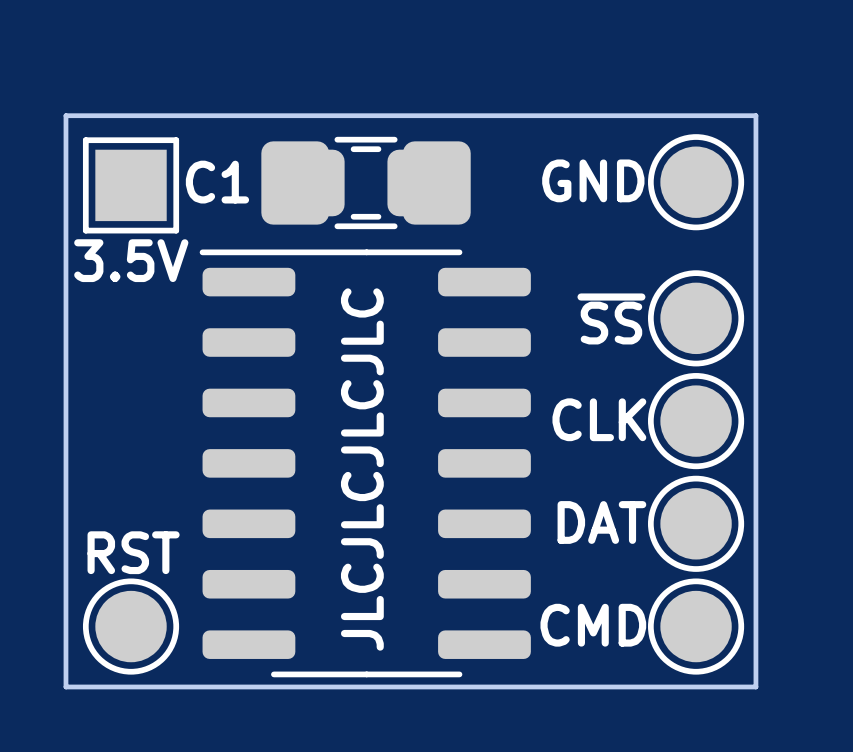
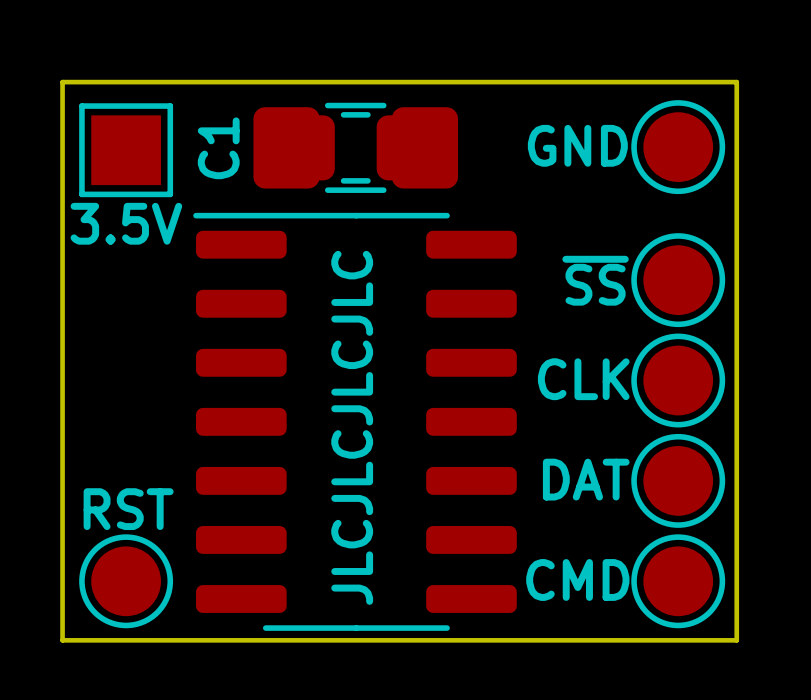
C1 name rotation: 0° (217, 182) -> 90° counterclockwise (218, 148)

